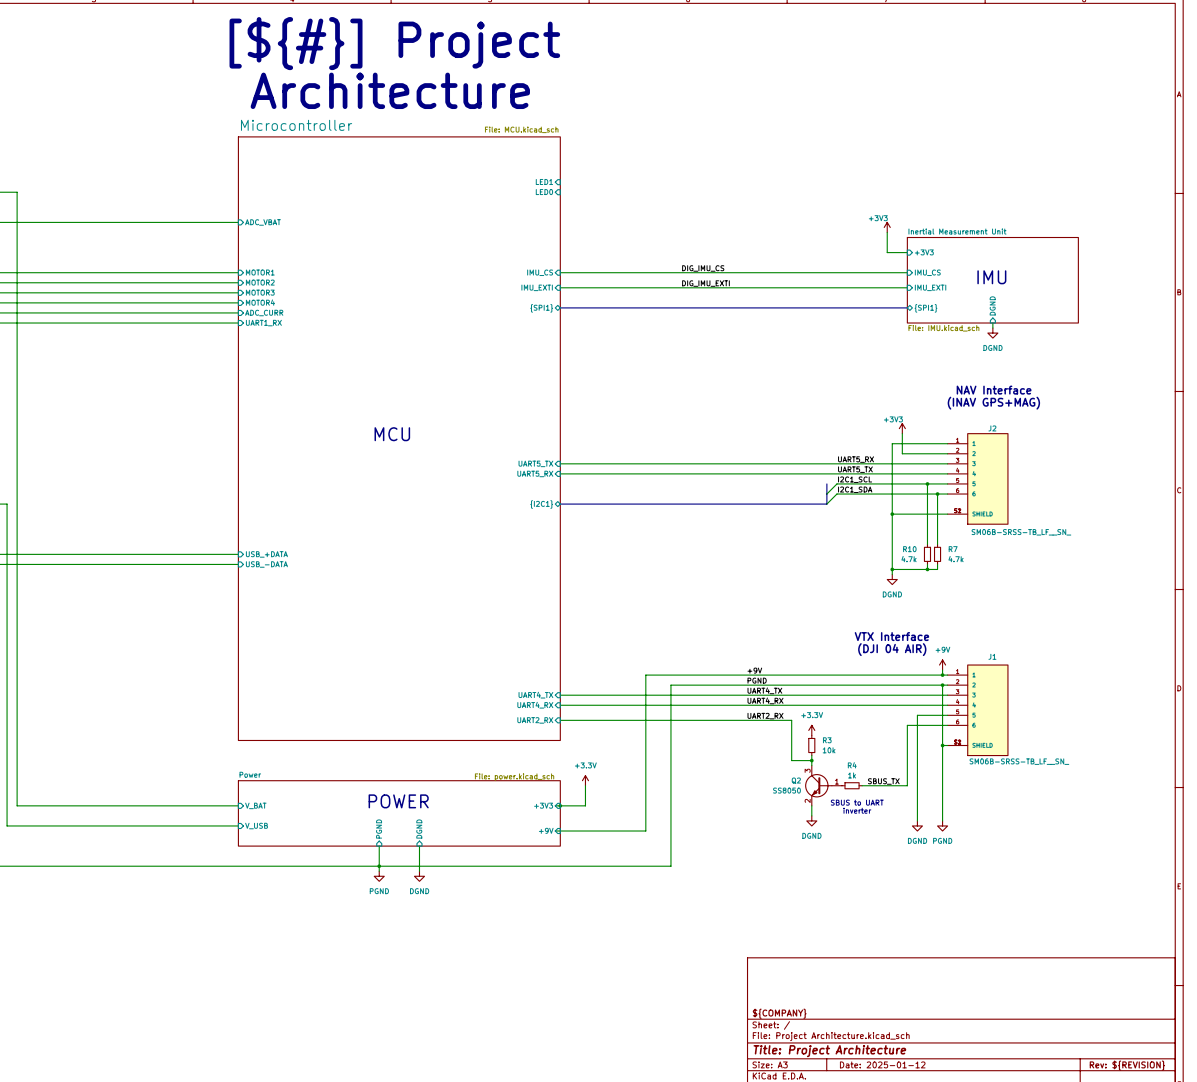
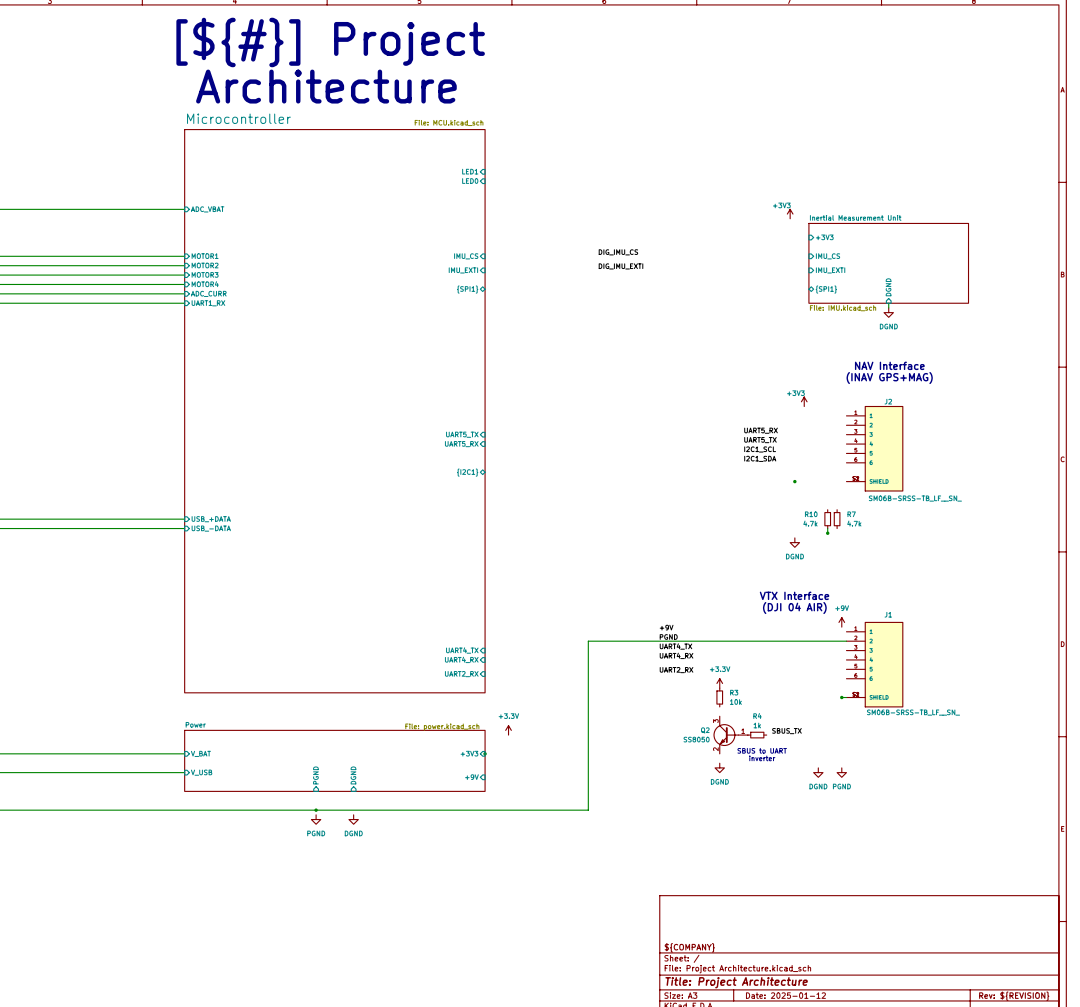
wire: (887, 232) (887, 252) (907, 252) -> none
wire: (560, 272) (907, 272) -> none
text: IMU (991, 277) -> none
wire: (560, 287) (907, 287) -> none
bus: (560, 307) (907, 307) -> none
wire: (902, 433) (902, 453) (947, 453) -> none
text: MCU (392, 434) -> none
wire: (947, 443) (892, 443) (892, 574) -> none
wire: (560, 463) (947, 463) -> none
wire: (560, 473) (947, 473) -> none
bus: (826, 483) (826, 504) (560, 504) -> none
wire: (927, 483) (927, 544) -> none
junction: (927, 483) -> none
wire: (947, 483) (836, 483) (826, 494) -> none
wire: (937, 494) (937, 544) -> none
junction: (937, 494) -> none
wire: (947, 494) (836, 494) (826, 504) -> none
wire: (892, 514) (947, 514) -> none
wire: (937, 564) (937, 569) (892, 569) -> none
junction: (892, 569) -> none
wire: (942, 670) (942, 675) -> none
junction: (942, 675) -> none
wire: (947, 675) (645, 675) (645, 831) (555, 831) -> none
wire: (942, 685) (942, 820) -> none
junction: (942, 685) -> none
wire: (560, 695) (947, 695) -> none
wire: (560, 705) (947, 705) -> none
wire: (947, 715) (917, 715) (917, 820) -> none
wire: (560, 720) (791, 720) (791, 760) (811, 760) -> none
wire: (947, 725) (907, 725) (907, 785) (862, 785) -> none
wire: (811, 755) (811, 765) -> none
junction: (811, 760) -> none
wire: (585, 785) (585, 805) (555, 805) -> none
text: POWER (398, 801) -> none
wire: (811, 805) (811, 815) -> none
wire: (379, 846) (379, 871) -> none
wire: (419, 846) (419, 871) -> none

